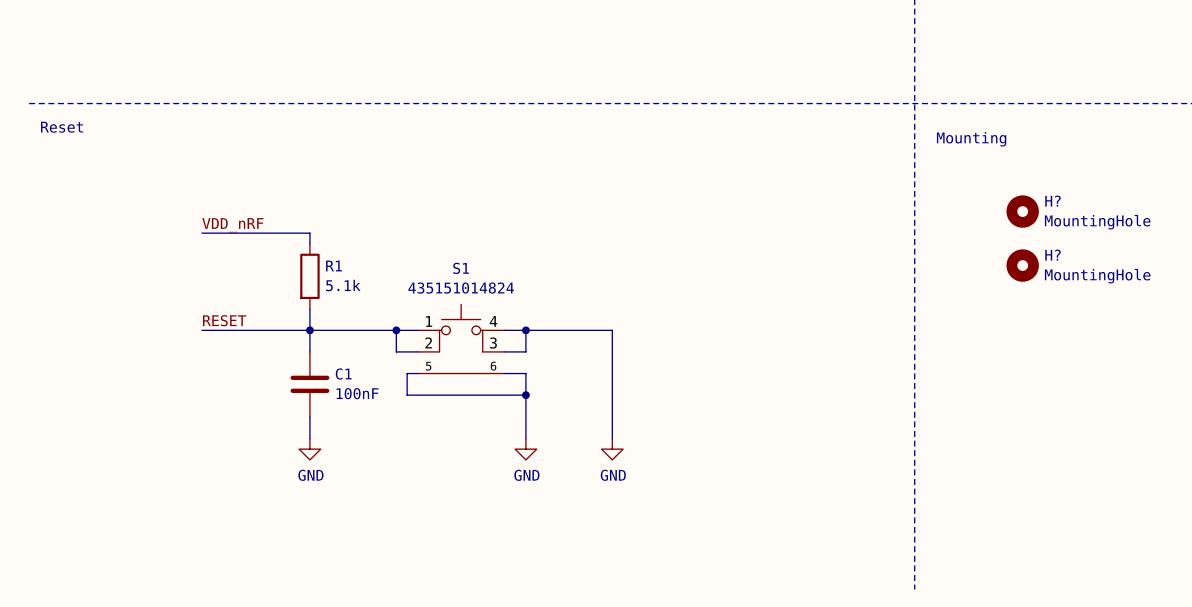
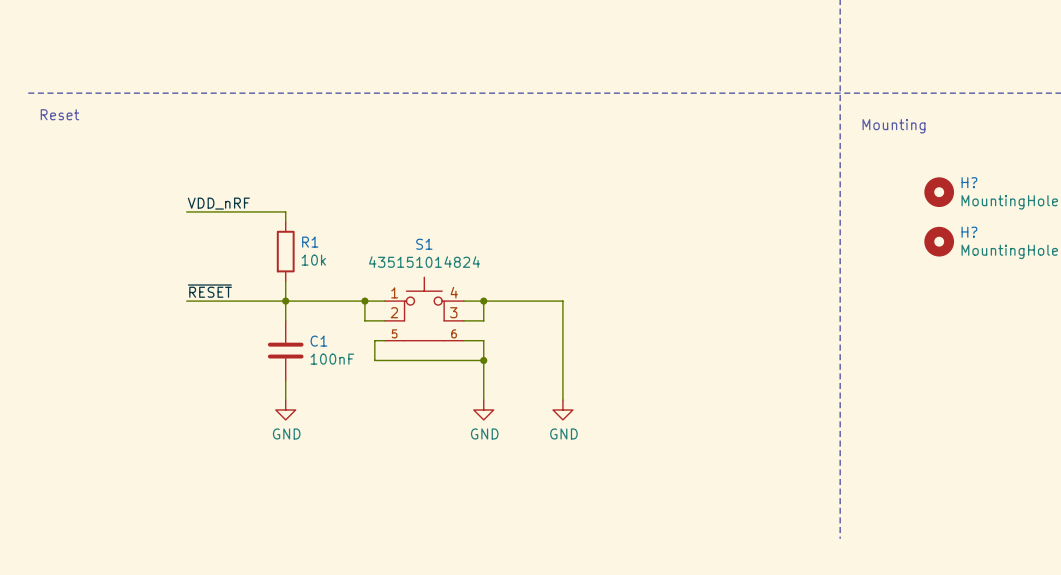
R1 value: 5.1k (343, 285) -> 10k (313, 260)
label: RESET (224, 320) -> ~{RESET} (209, 291)

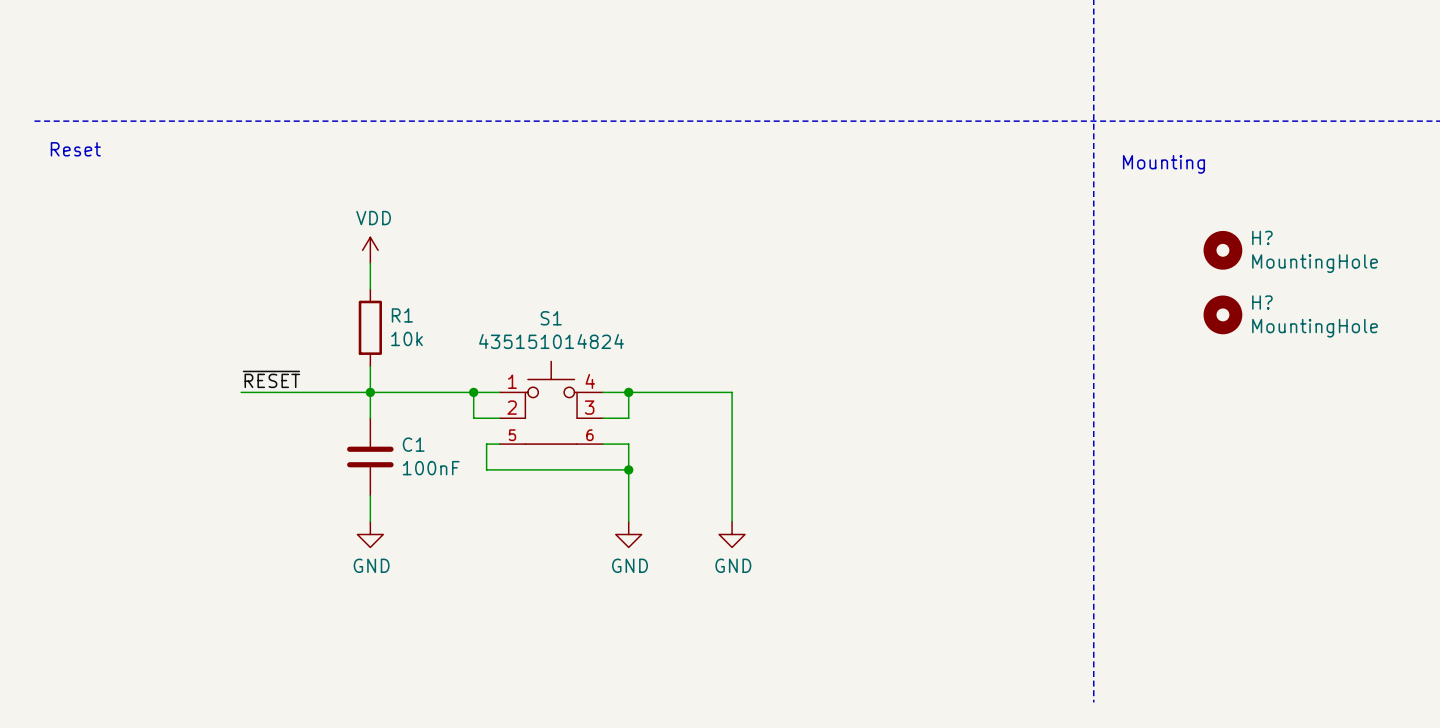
power symbol: none -> VDD (370, 250)
label: VDD_nRF (218, 203) -> none
wire: (186, 211) (285, 211) -> (370, 263) (370, 276)

